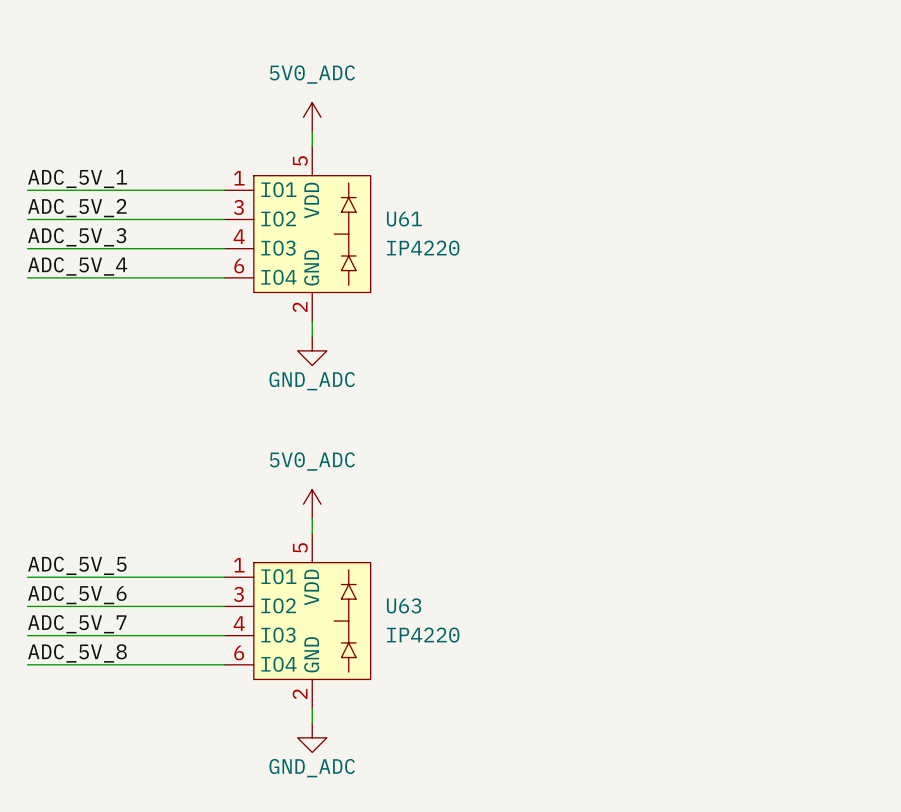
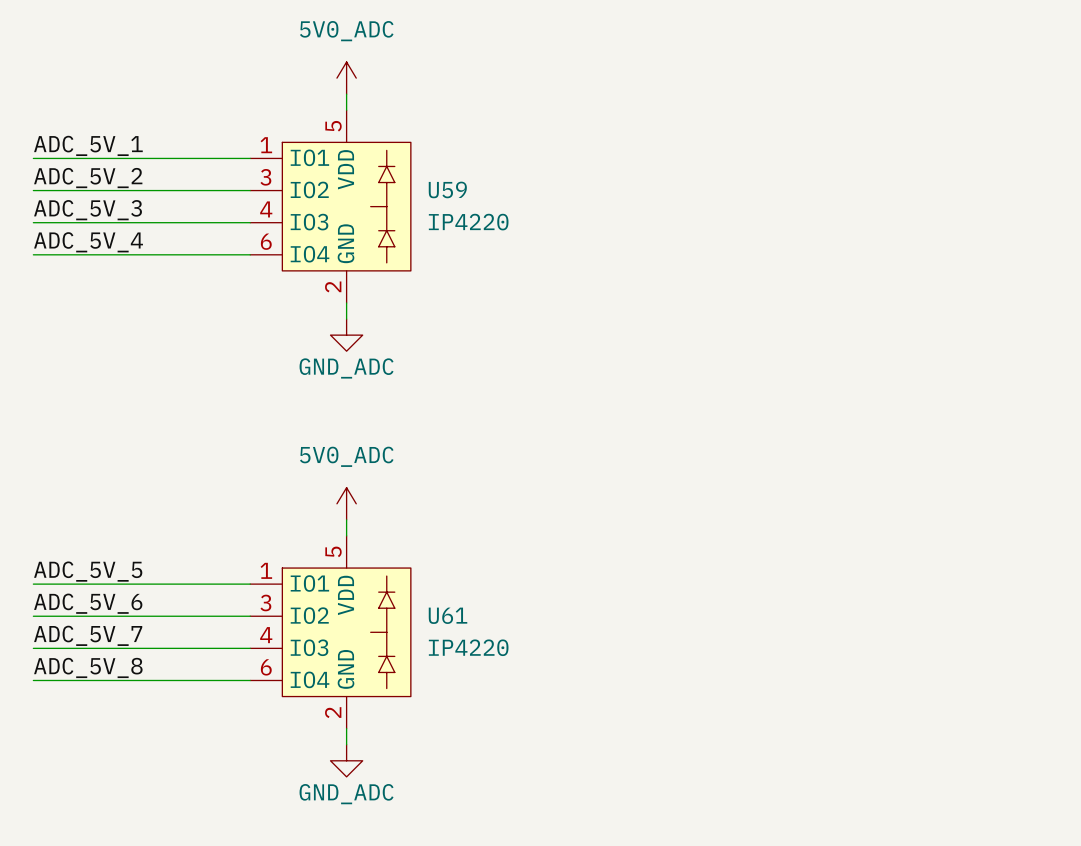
U61 name: U61 (404, 219) -> U59 (447, 189)
U63 name: U63 (404, 605) -> U61 (448, 615)

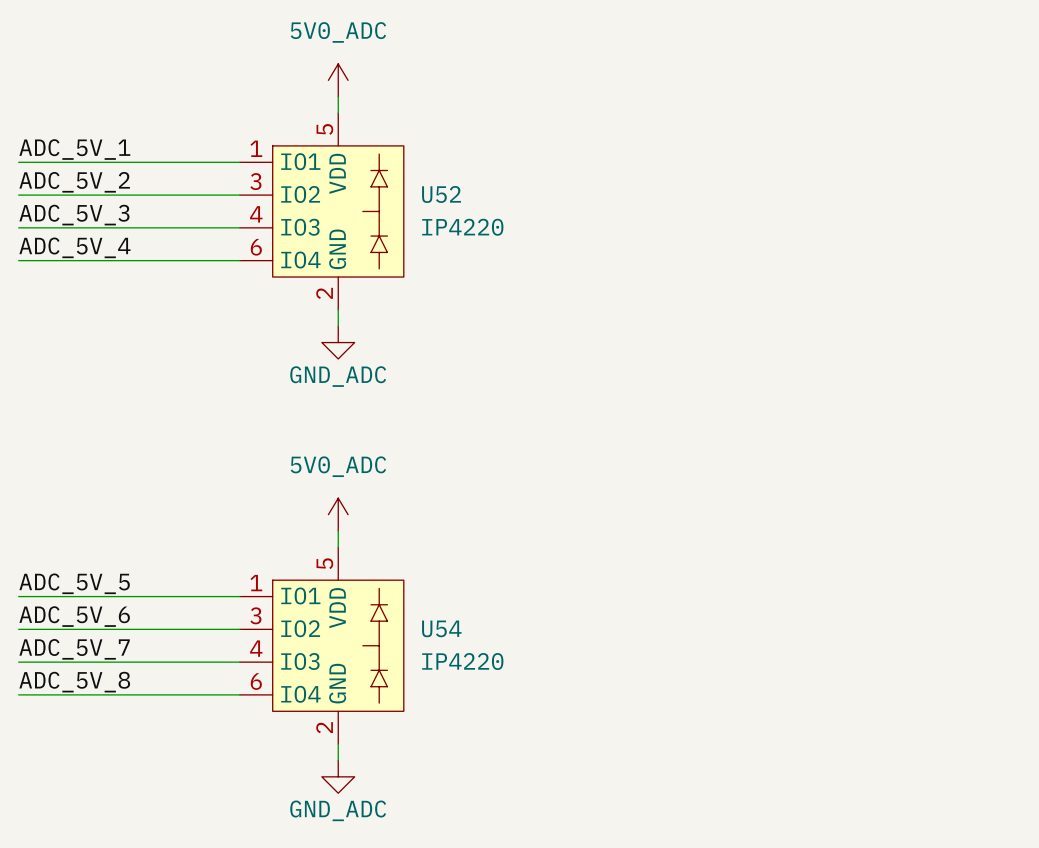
U59 name: U59 (447, 189) -> U52 (441, 194)
U61 name: U61 (448, 615) -> U54 (441, 628)

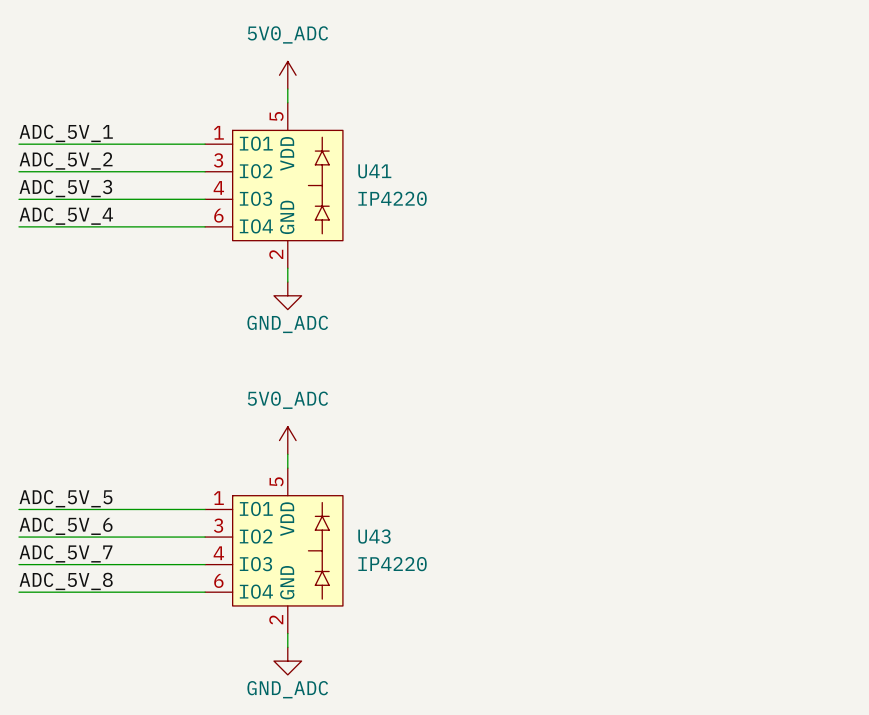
U52 name: U52 (441, 194) -> U41 (374, 171)
U54 name: U54 (441, 628) -> U43 (374, 536)

